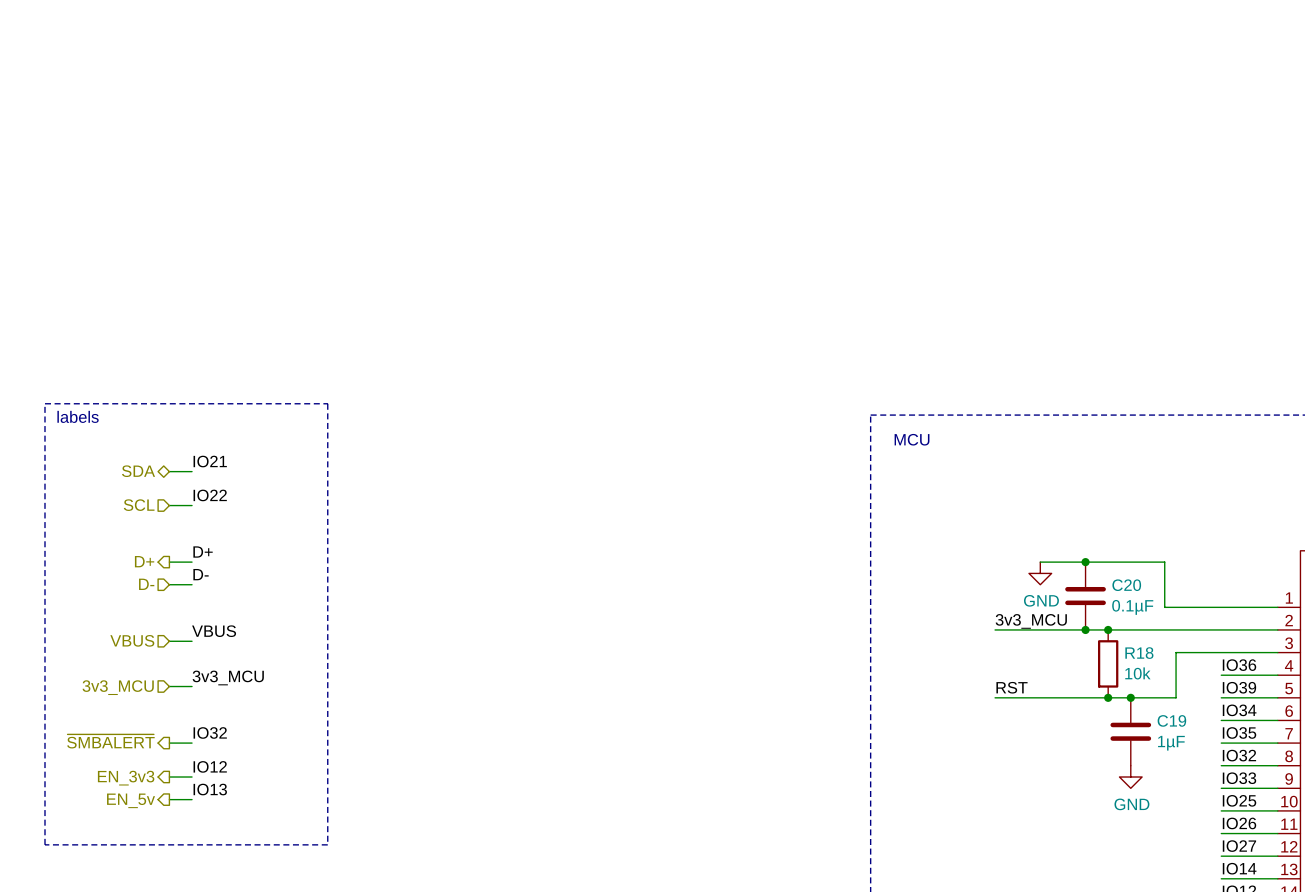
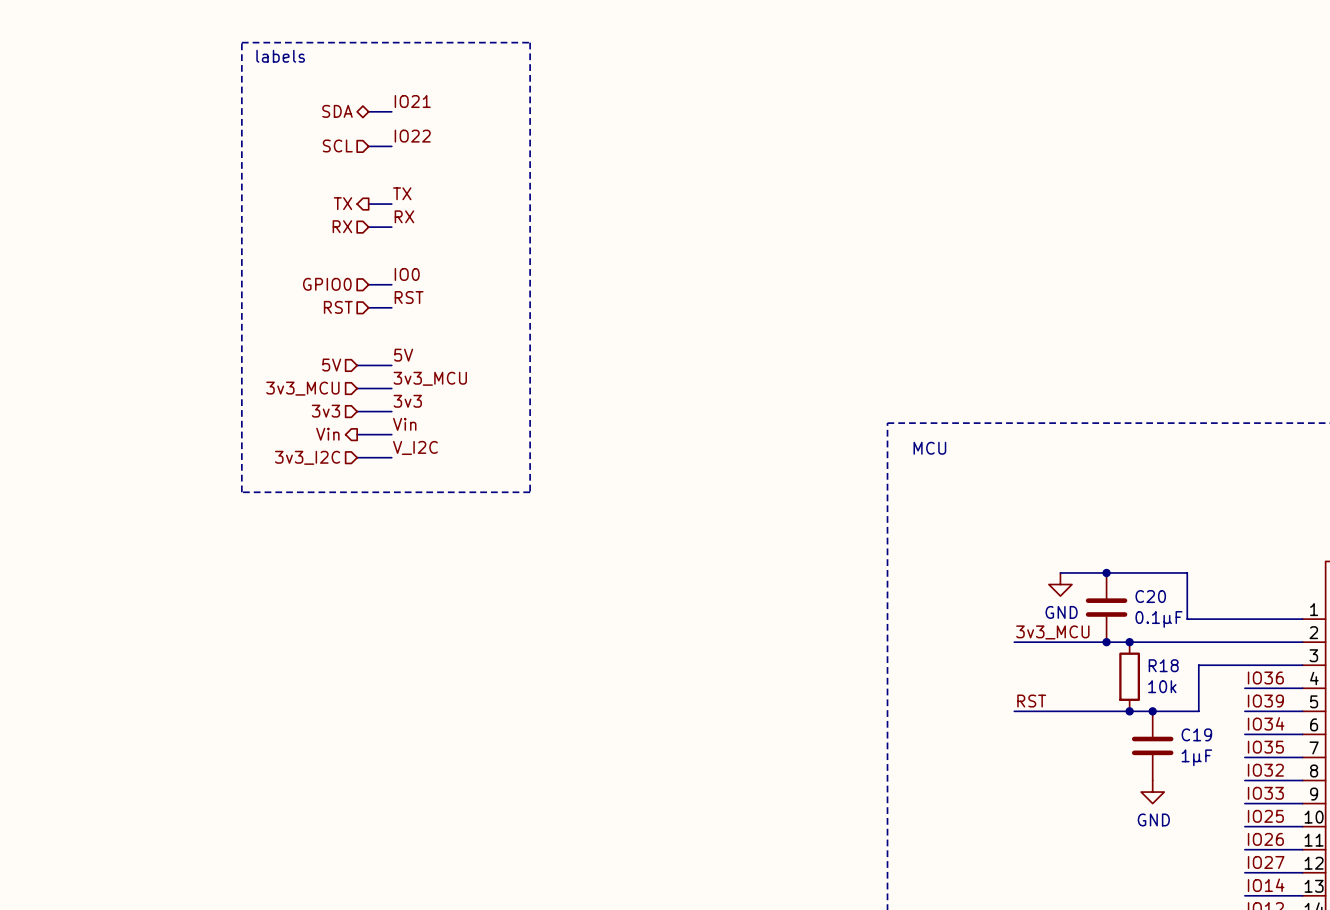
line: none -> (241, 42) (530, 42) (530, 492) (241, 492) (241, 42)
text: none -> labels (280, 56)
label: none -> IO21 (412, 101)
hierarchical label: none -> SDA (337, 111)
wire: none -> (368, 111) (391, 111)
label: none -> IO22 (412, 136)
hierarchical label: none -> SCL (337, 145)
wire: none -> (368, 146) (391, 146)
label: none -> TX (402, 193)
hierarchical label: none -> TX (342, 203)
wire: none -> (368, 204) (391, 204)
label: none -> RX (404, 216)
hierarchical label: none -> RX (342, 226)
wire: none -> (368, 227) (391, 227)
label: none -> IO0 (407, 274)
hierarchical label: none -> GPIO0 (327, 284)
wire: none -> (368, 284) (391, 284)
label: none -> RST (409, 297)
hierarchical label: none -> RST (338, 307)
wire: none -> (368, 307) (391, 307)
label: none -> 5V (403, 355)
hierarchical label: none -> 5V (331, 365)
wire: none -> (357, 365) (391, 365)
label: none -> 3v3_MCU (430, 378)
wire: none -> (357, 388) (391, 388)
hierarchical label: none -> 3v3_MCU (302, 388)
label: none -> 3v3 (407, 401)
line: (44, 403) (327, 403) (327, 844) (44, 844) (44, 403) -> none
hierarchical label: none -> 3v3 (325, 411)
wire: none -> (357, 411) (391, 411)
label: none -> Vin (404, 424)
text: labels (78, 416) -> none
hierarchical label: none -> Vin (327, 434)
wire: none -> (357, 434) (391, 434)
label: none -> V_I2C (415, 447)
wire: none -> (357, 457) (391, 457)
hierarchical label: none -> 3v3_I2C (307, 457)
label: IO21 (210, 461) -> none
hierarchical label: SDA (138, 471) -> none
wire: (169, 471) (192, 471) -> none
label: IO22 (210, 495) -> none
hierarchical label: SCL (139, 505) -> none
wire: (169, 505) (192, 505) -> none
label: D+ (203, 552) -> none
hierarchical label: D+ (144, 561) -> none
wire: (169, 562) (192, 562) -> none
label: D- (201, 574) -> none
hierarchical label: D- (146, 584) -> none
wire: (169, 584) (192, 584) -> none
label: VBUS (214, 631) -> none
hierarchical label: VBUS (132, 640) -> none
wire: (169, 641) (192, 641) -> none
label: 3v3_MCU (228, 677) -> none
wire: (169, 686) (192, 686) -> none
hierarchical label: 3v3_MCU (118, 687) -> none
label: IO32 (210, 732) -> none
hierarchical label: ~{SMBALERT} (110, 741) -> none
wire: (169, 743) (192, 743) -> none
label: IO12 (210, 766) -> none
wire: (169, 777) (192, 777) -> none
hierarchical label: EN_3v3 (126, 778) -> none
label: IO13 (210, 789) -> none
wire: (169, 799) (192, 799) -> none
hierarchical label: EN_5v (131, 800) -> none

